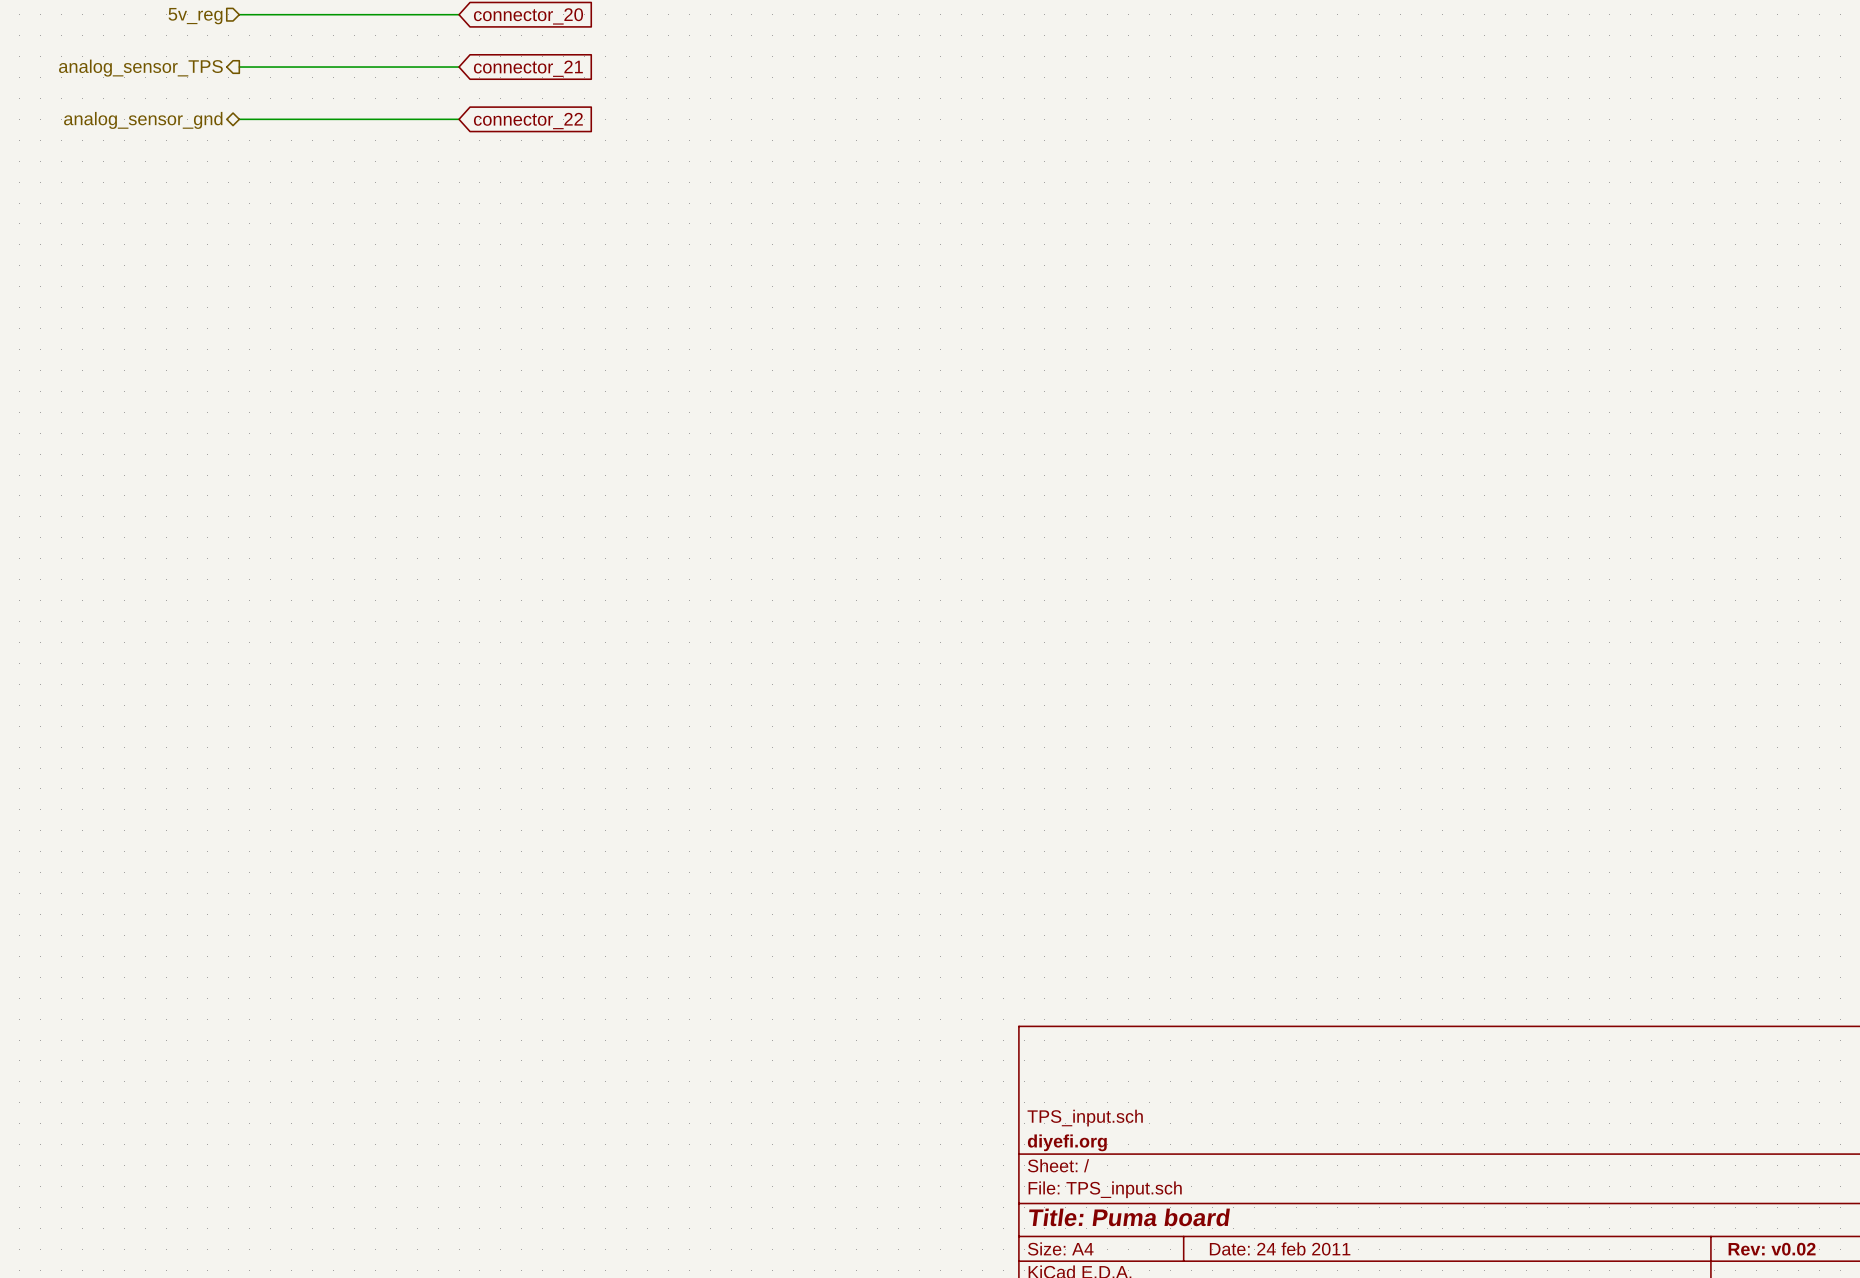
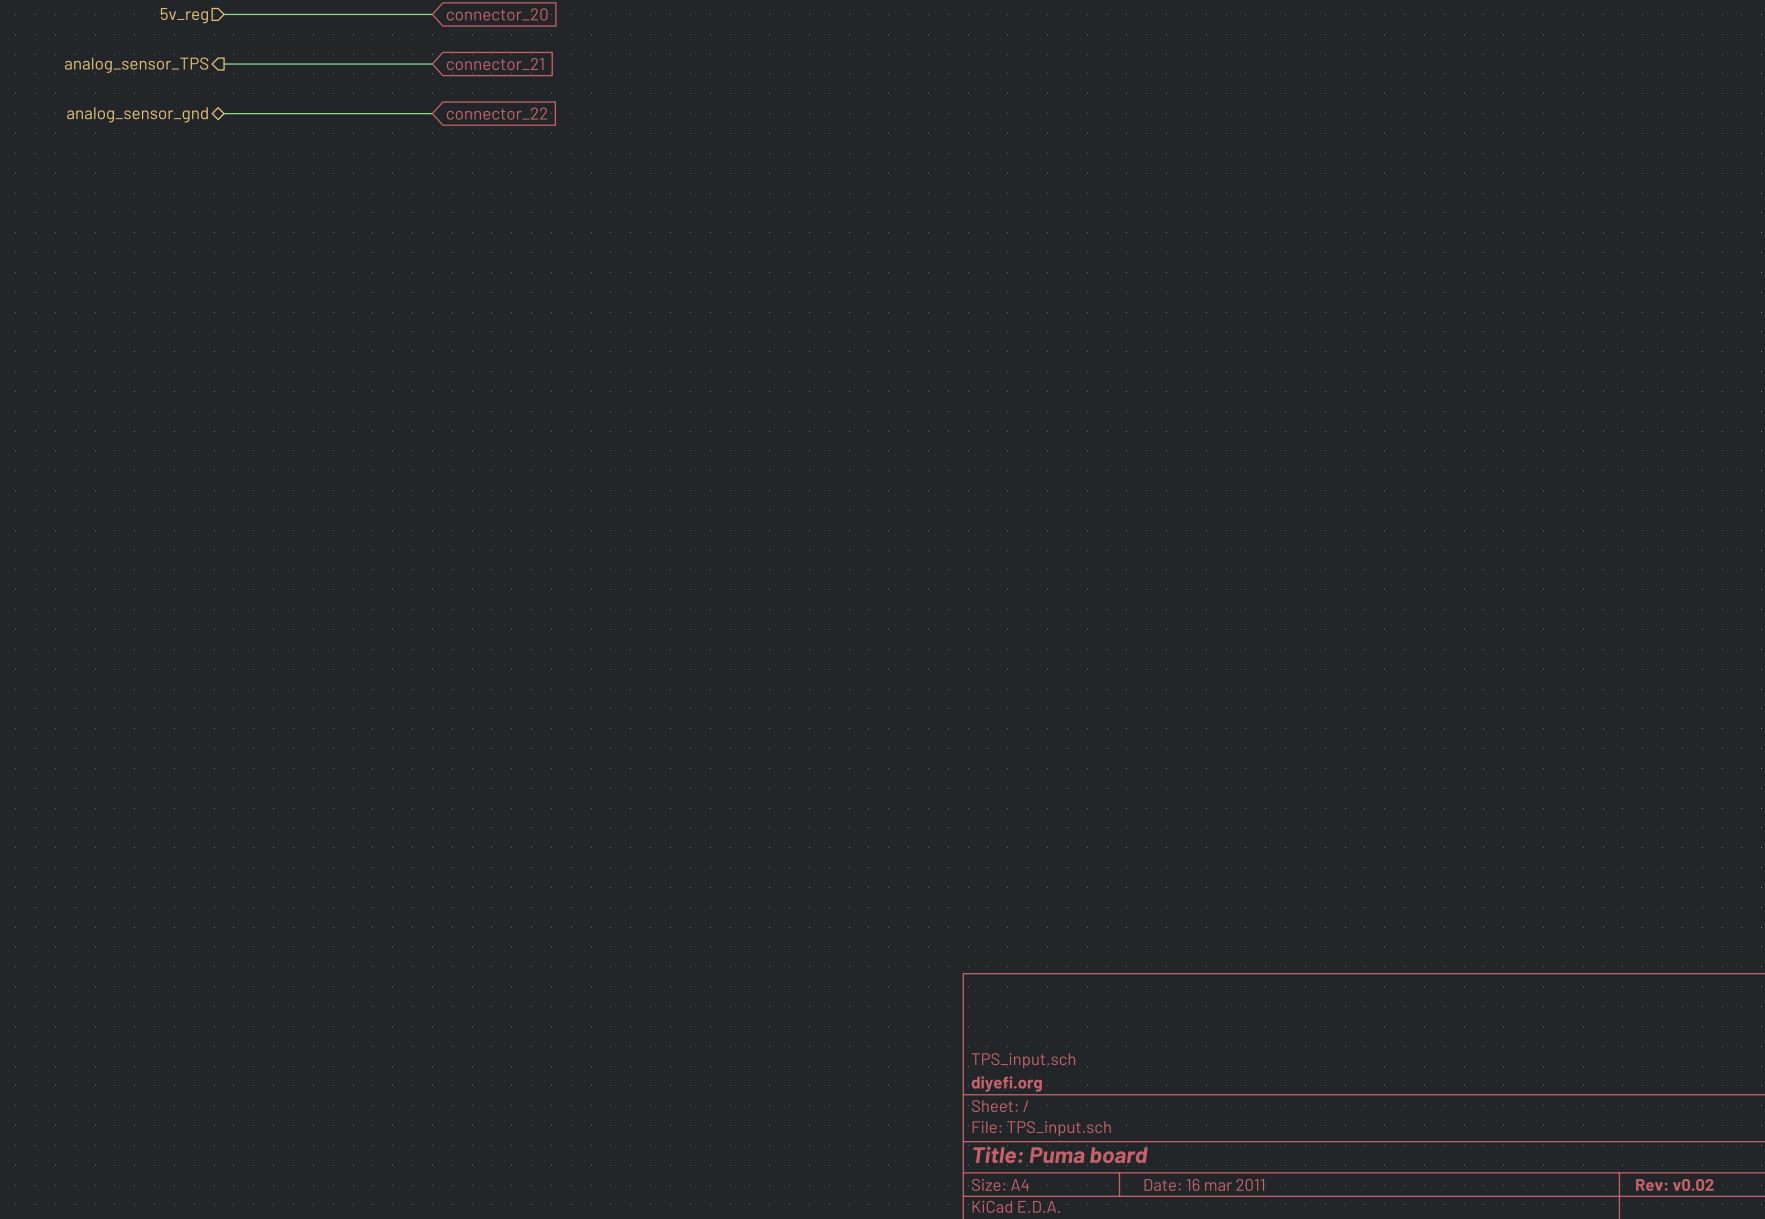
title block: Date: 24 feb 2011 (1280, 1248) -> Date: 16 mar 2011 (1204, 1184)

